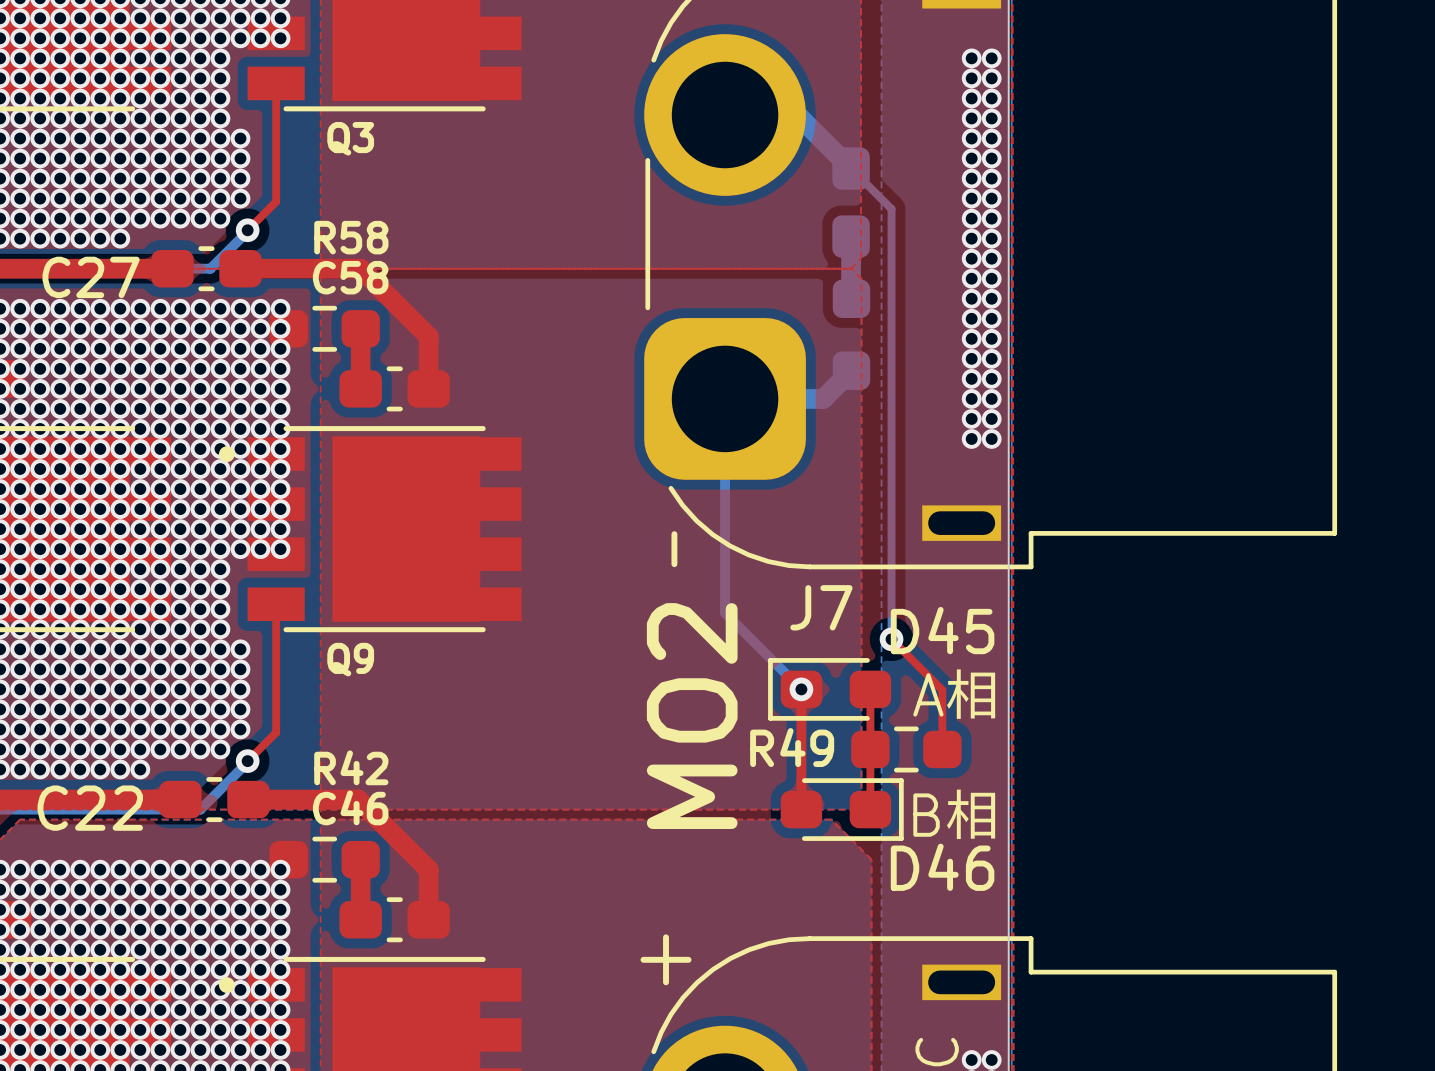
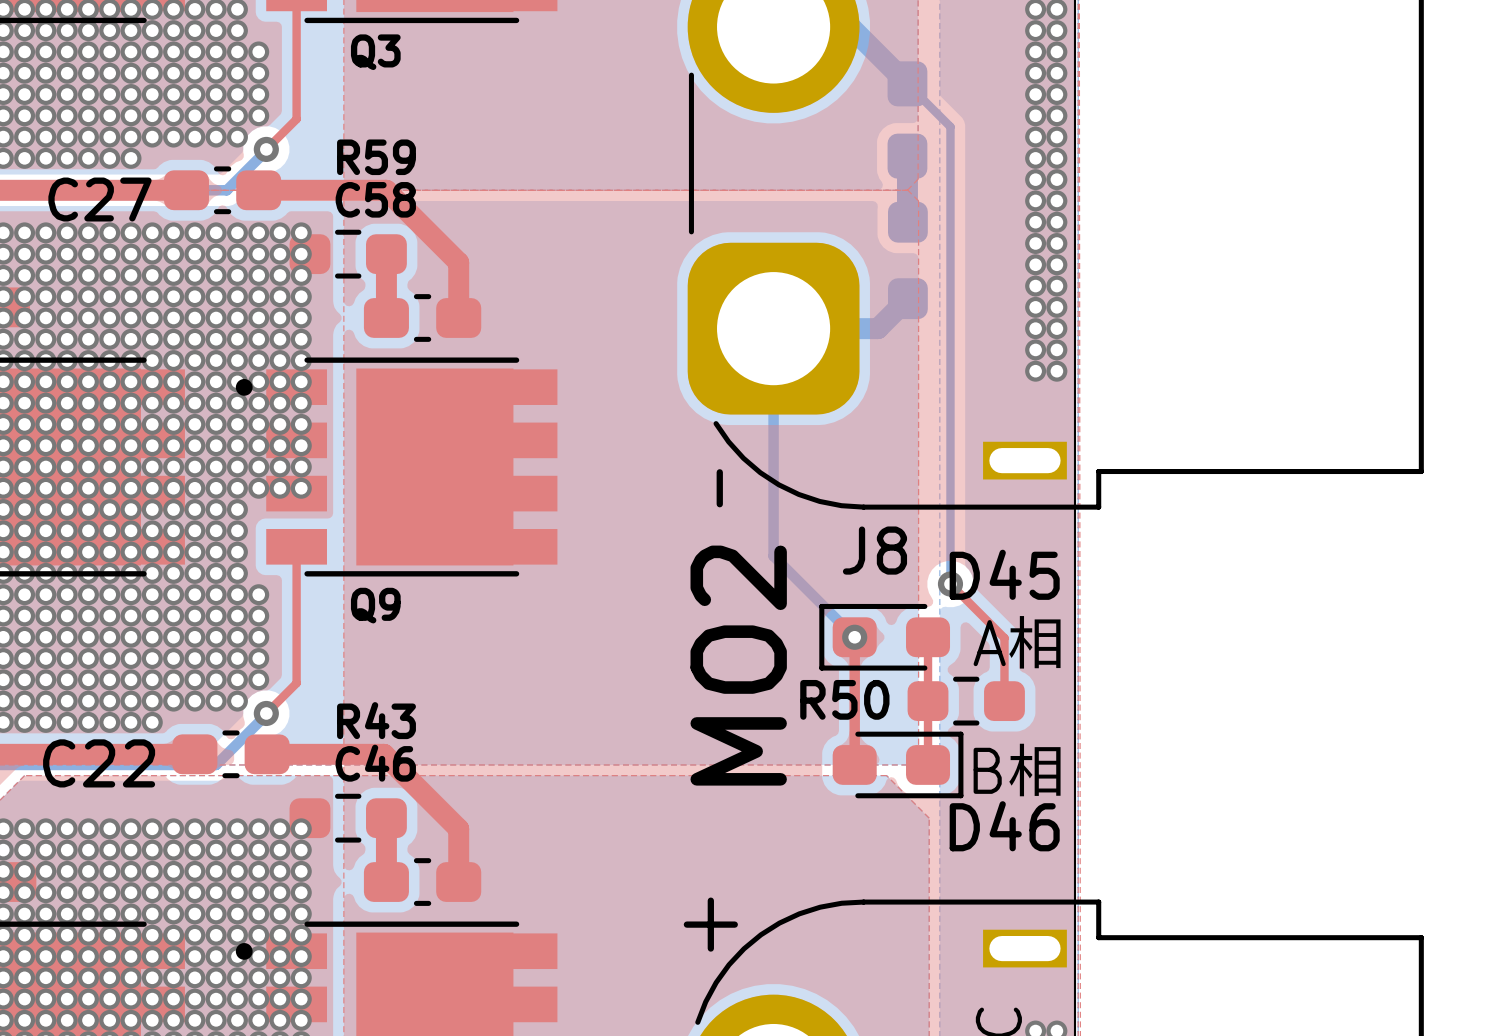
R58 name: R58 (351, 237) -> R59 (376, 157)
J7 name: J7 (821, 607) -> J8 (874, 550)
R49 name: R49 (792, 747) -> R50 (844, 699)
R42 name: R42 (351, 767) -> R43 (376, 720)

